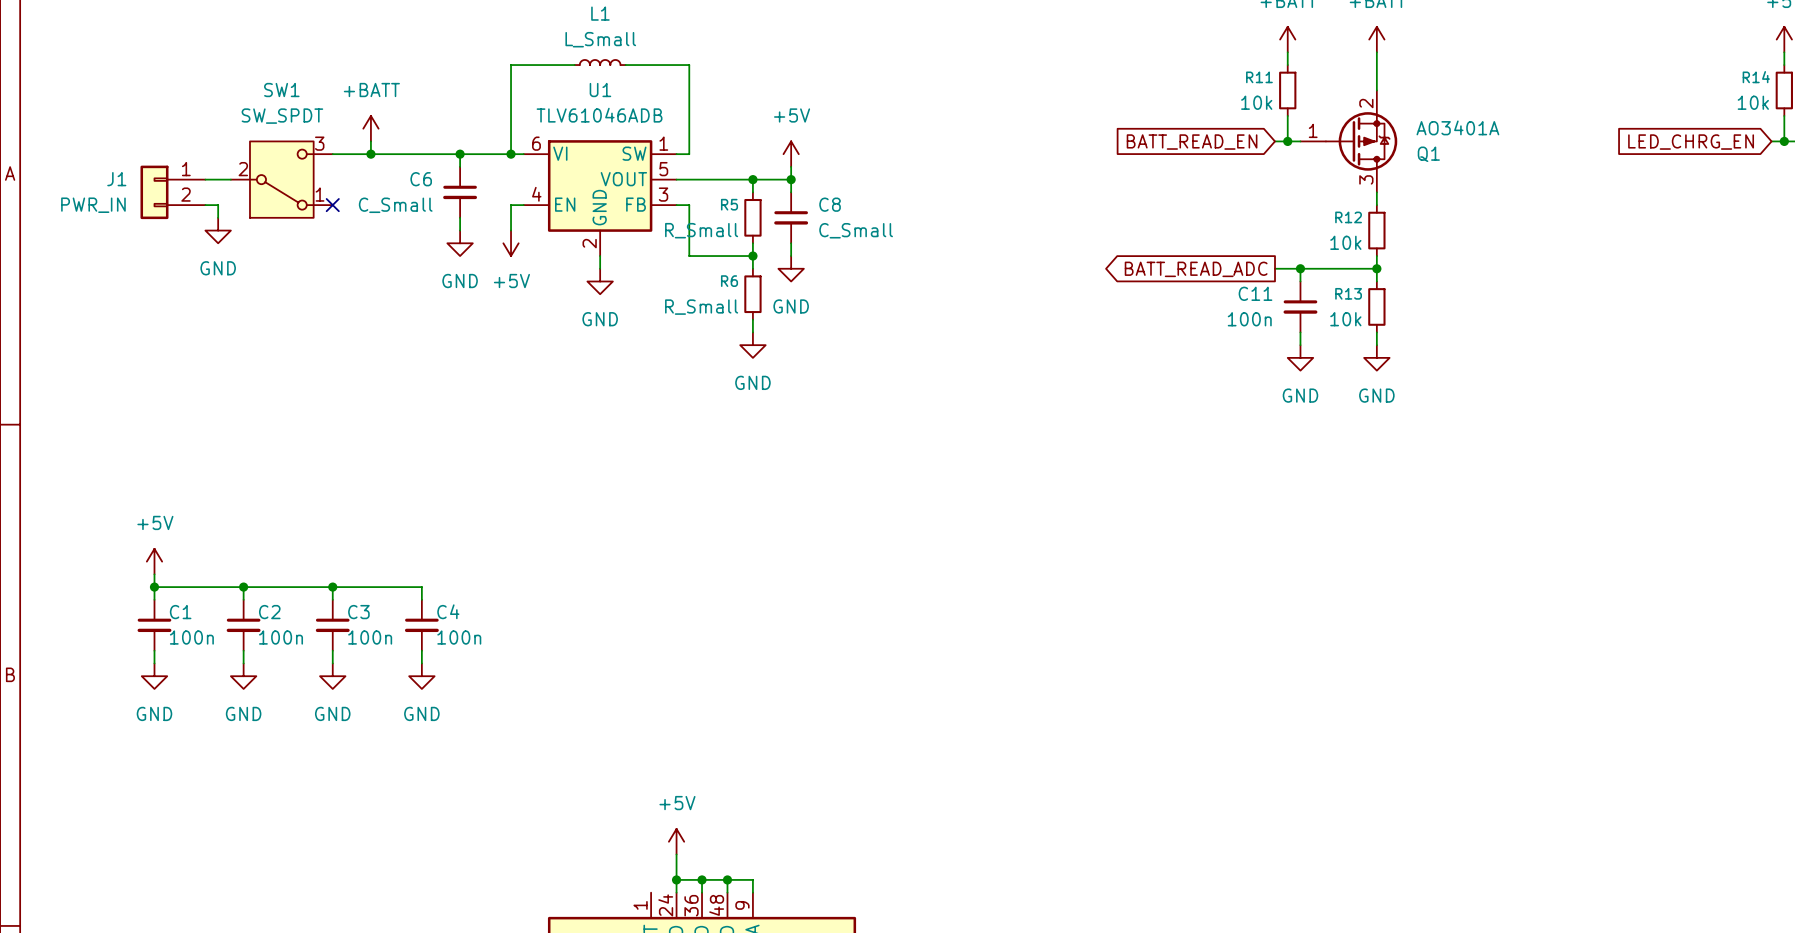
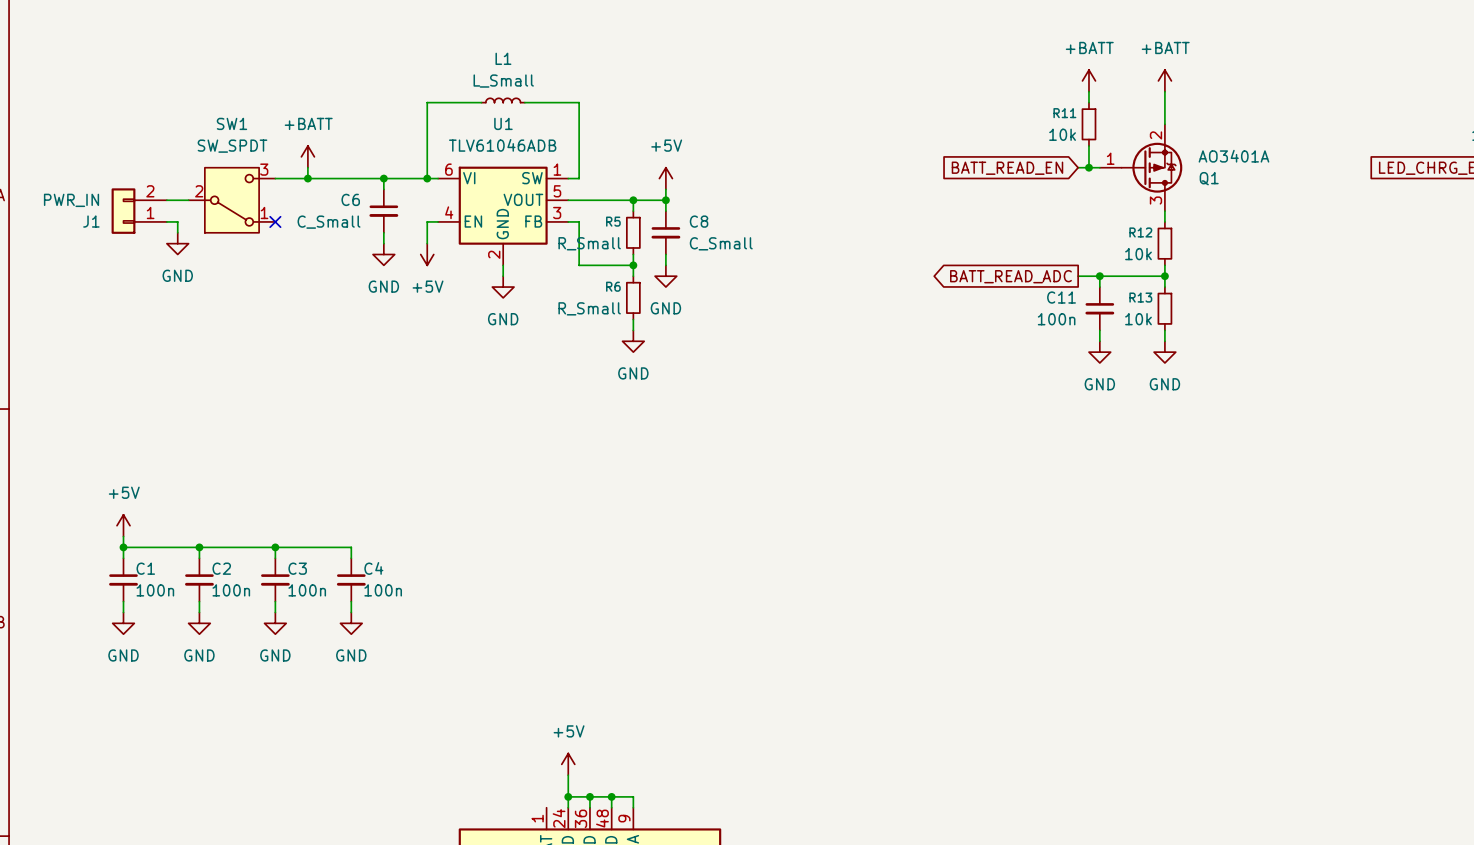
J1 flip: as is (154, 192) -> up-down (123, 211)

